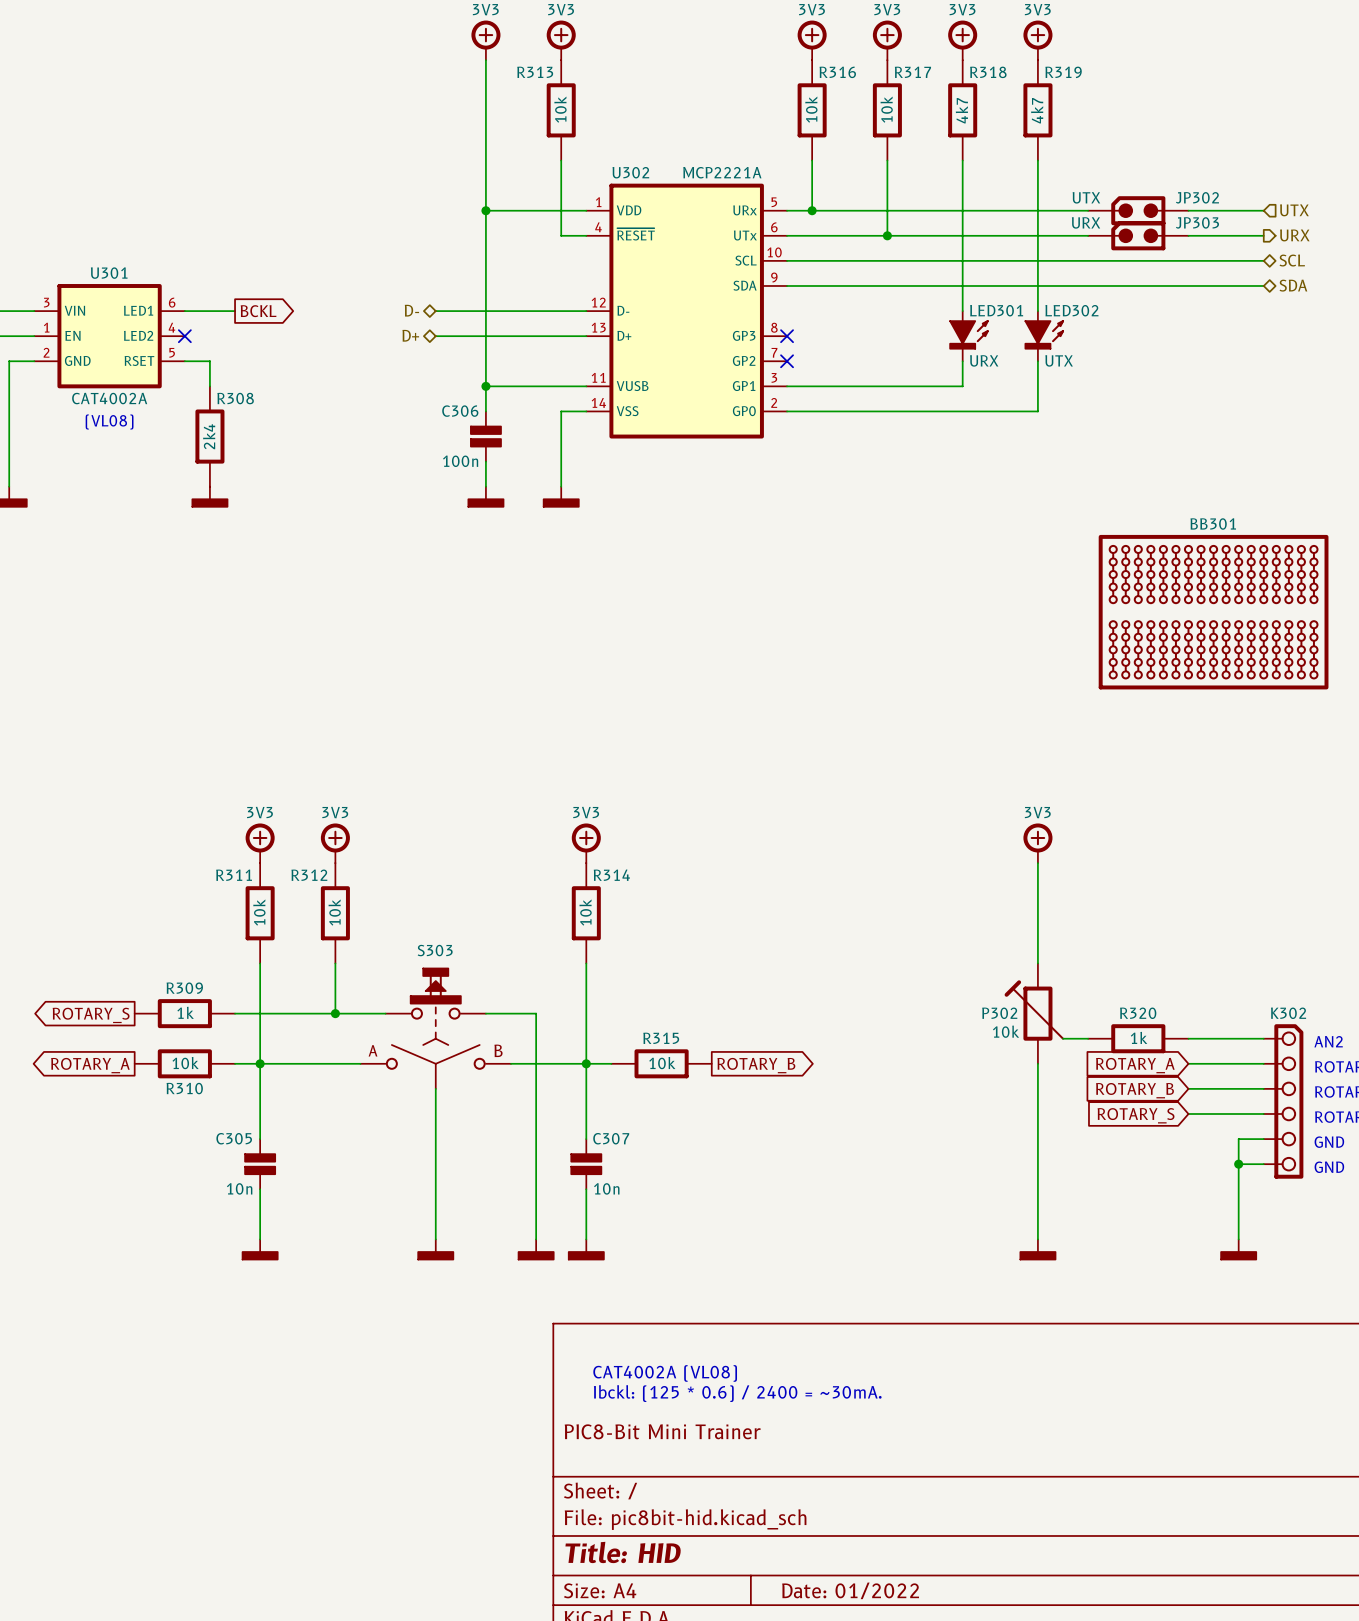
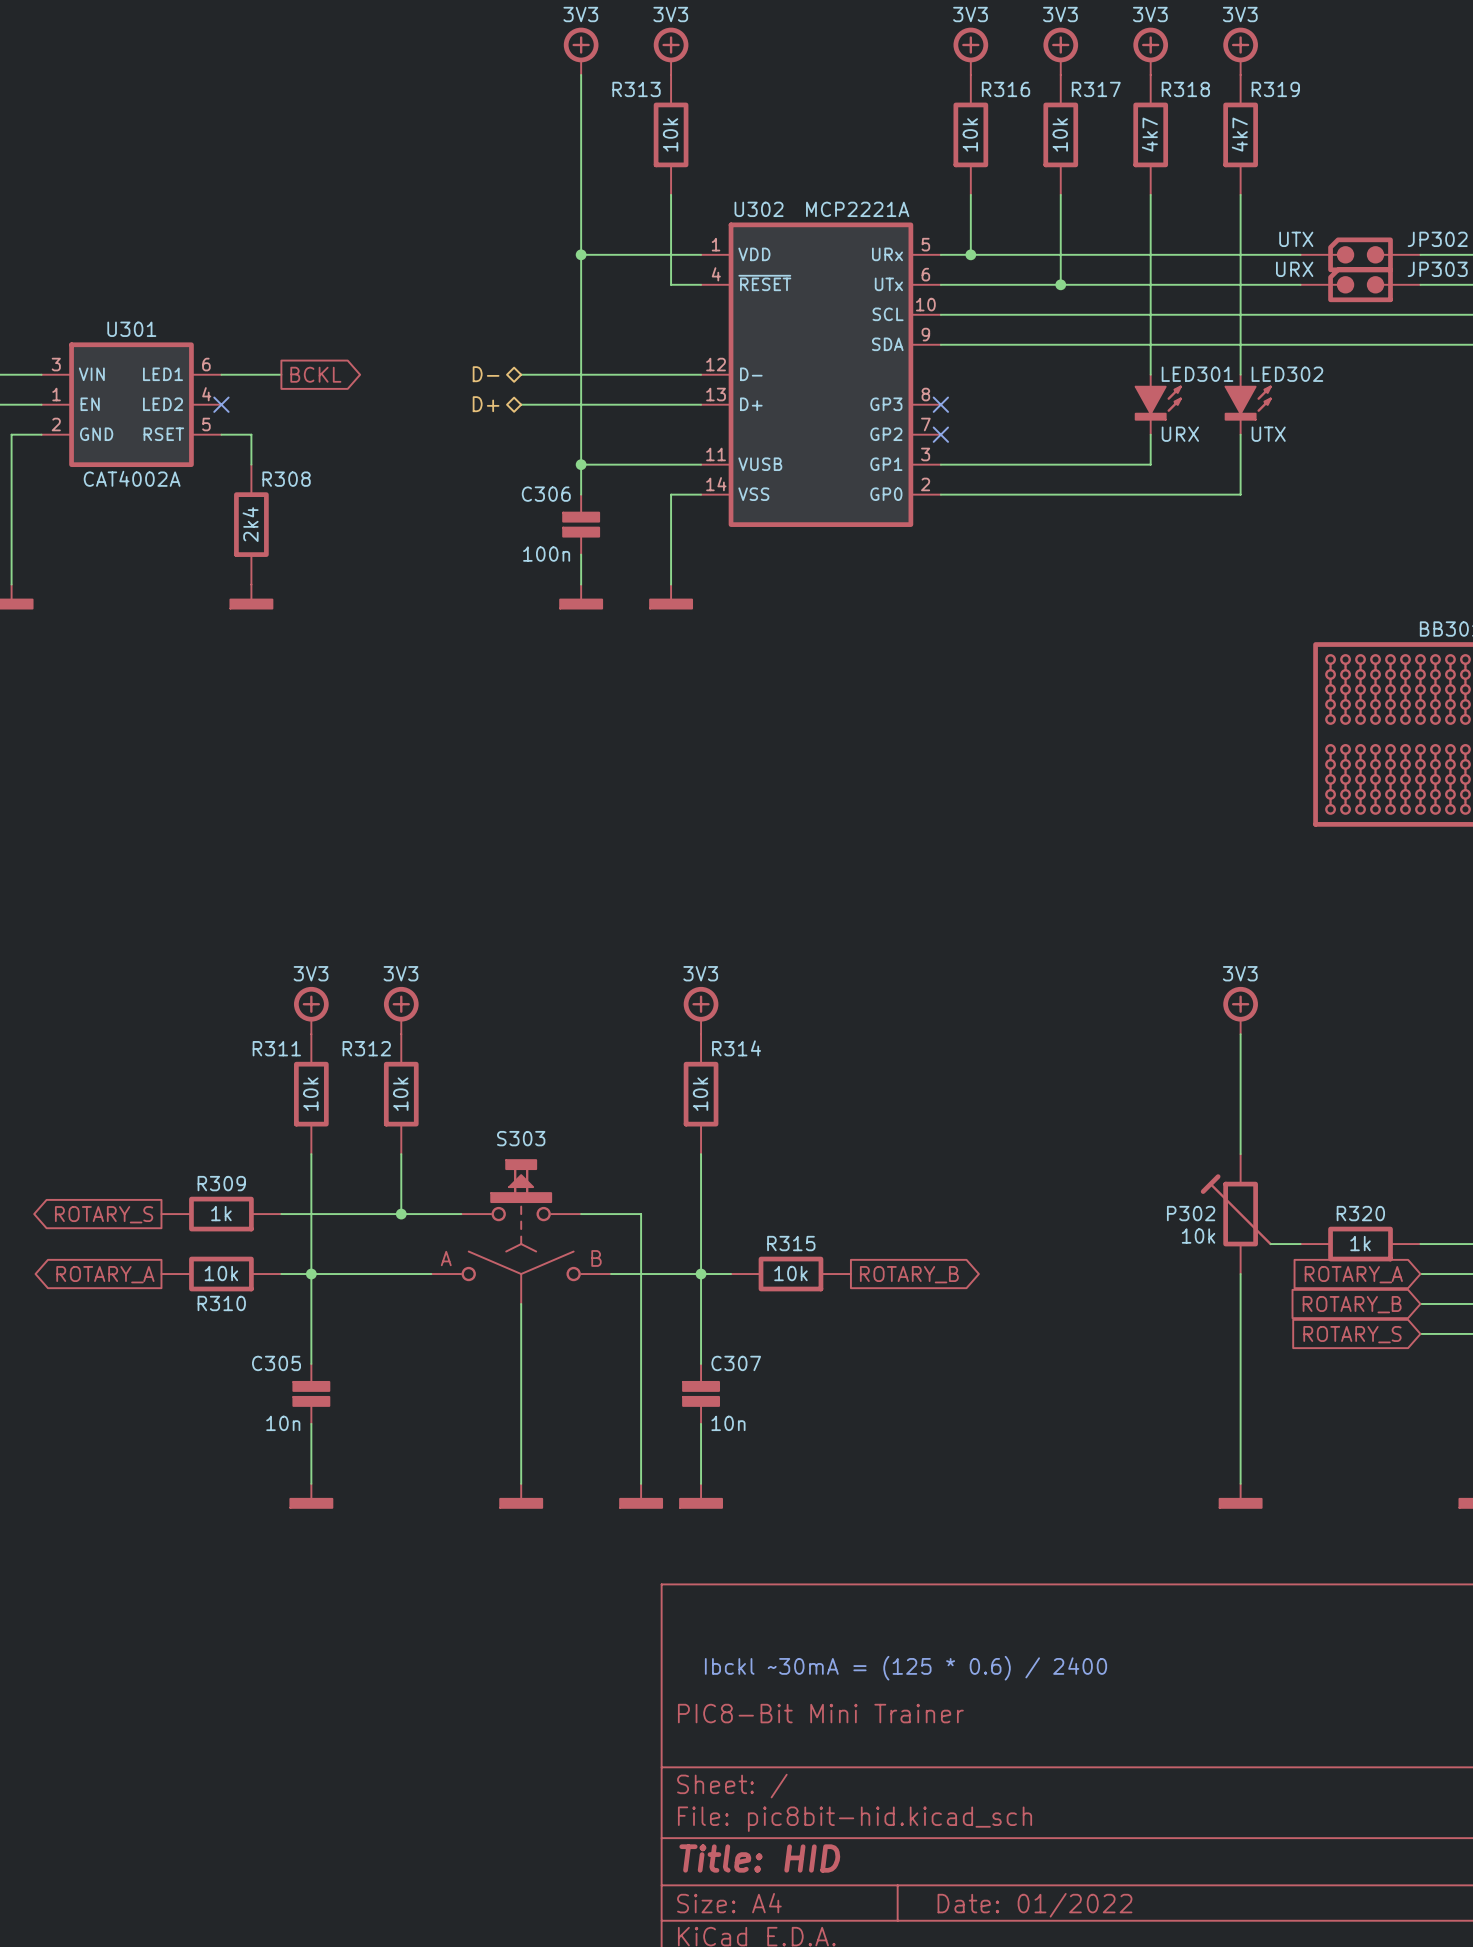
text: (VL08) (109, 421) -> none
text: CAT4002A (VL08) (665, 1373) -> none
text: Ibckl: (125 * 0.6) / 2400 = ~30mA. (737, 1393) -> Ibckl ~30mA = (125 * 0.6) / 2400 (906, 1668)

